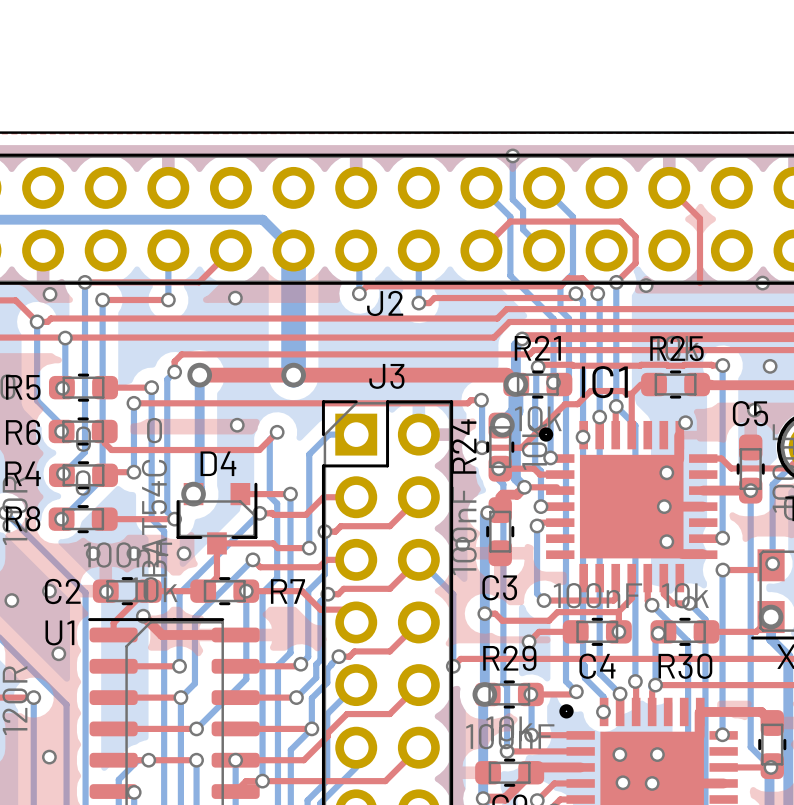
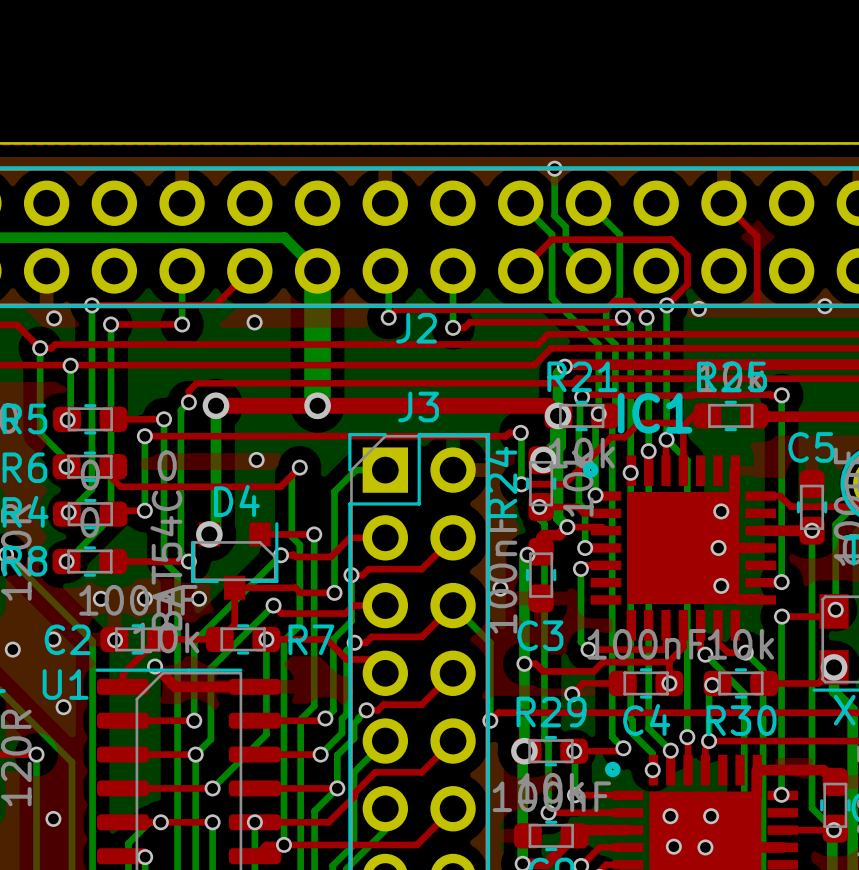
via: (770, 366) -> none
via: (754, 410) -> none
via: (685, 422) -> none

